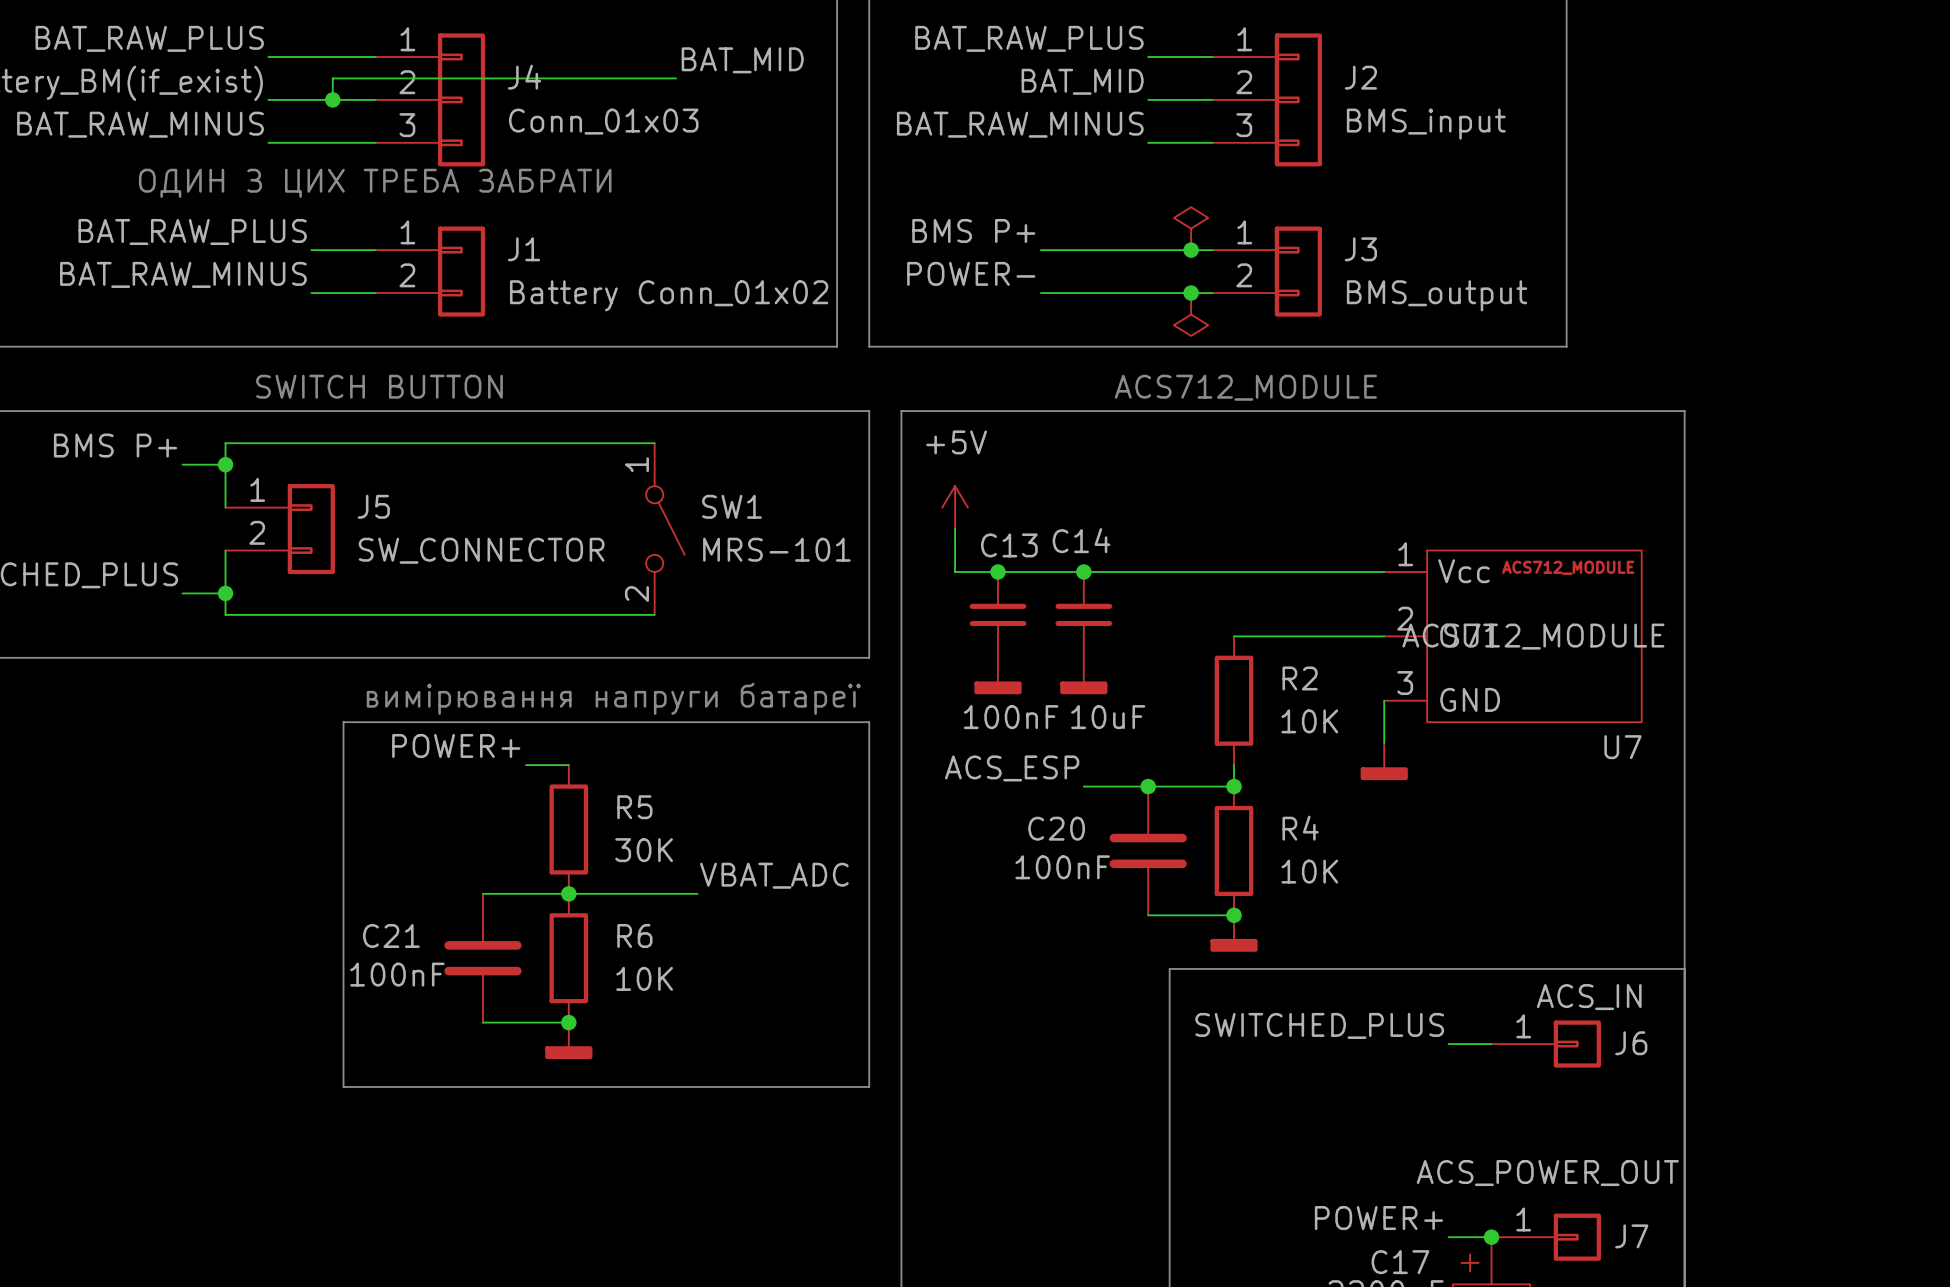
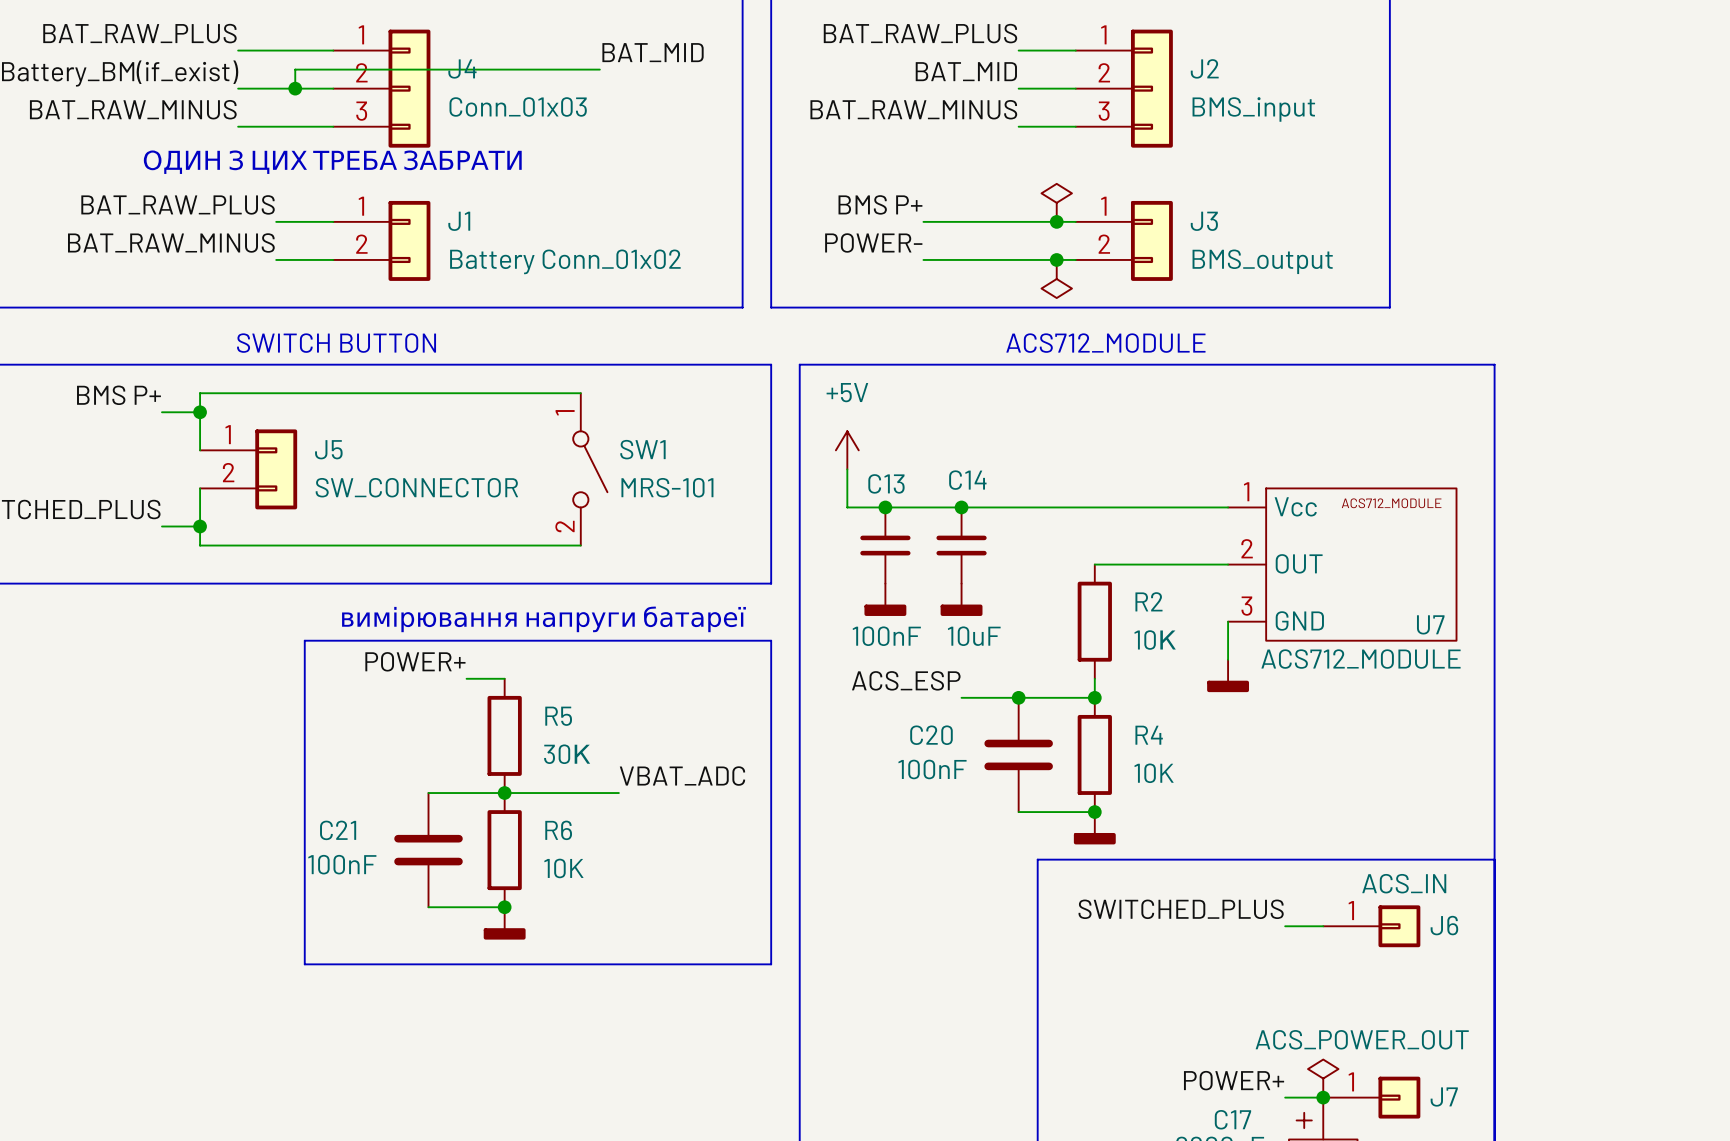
U7 value position: ACS712_MODULE (1533, 636) -> ACS712_MODULE (1360, 659)
U7 name position: U7 (1622, 747) -> U7 (1430, 624)
power symbol: none -> (1323, 1078)

